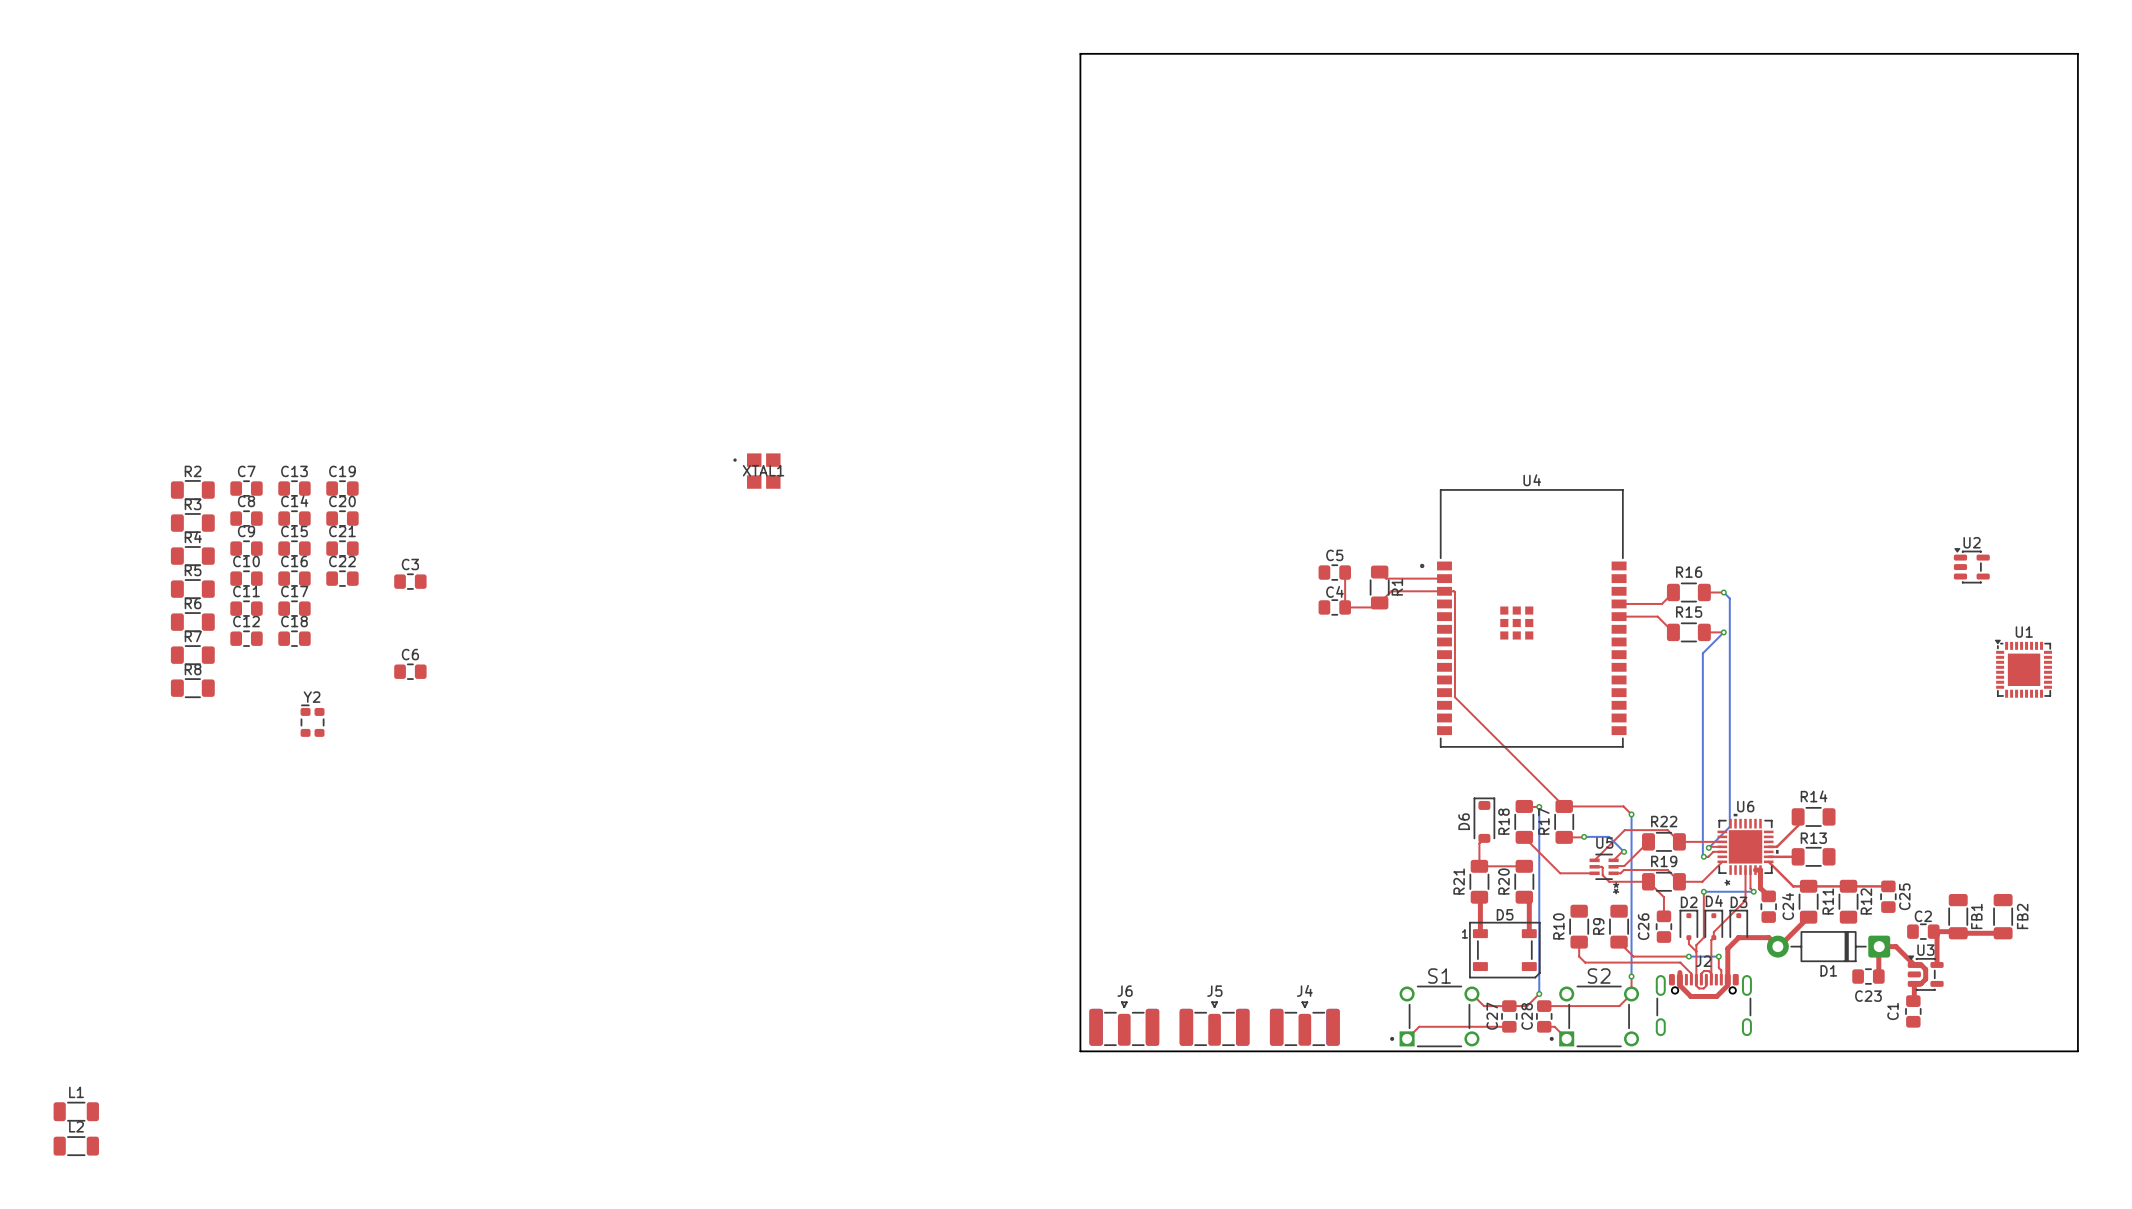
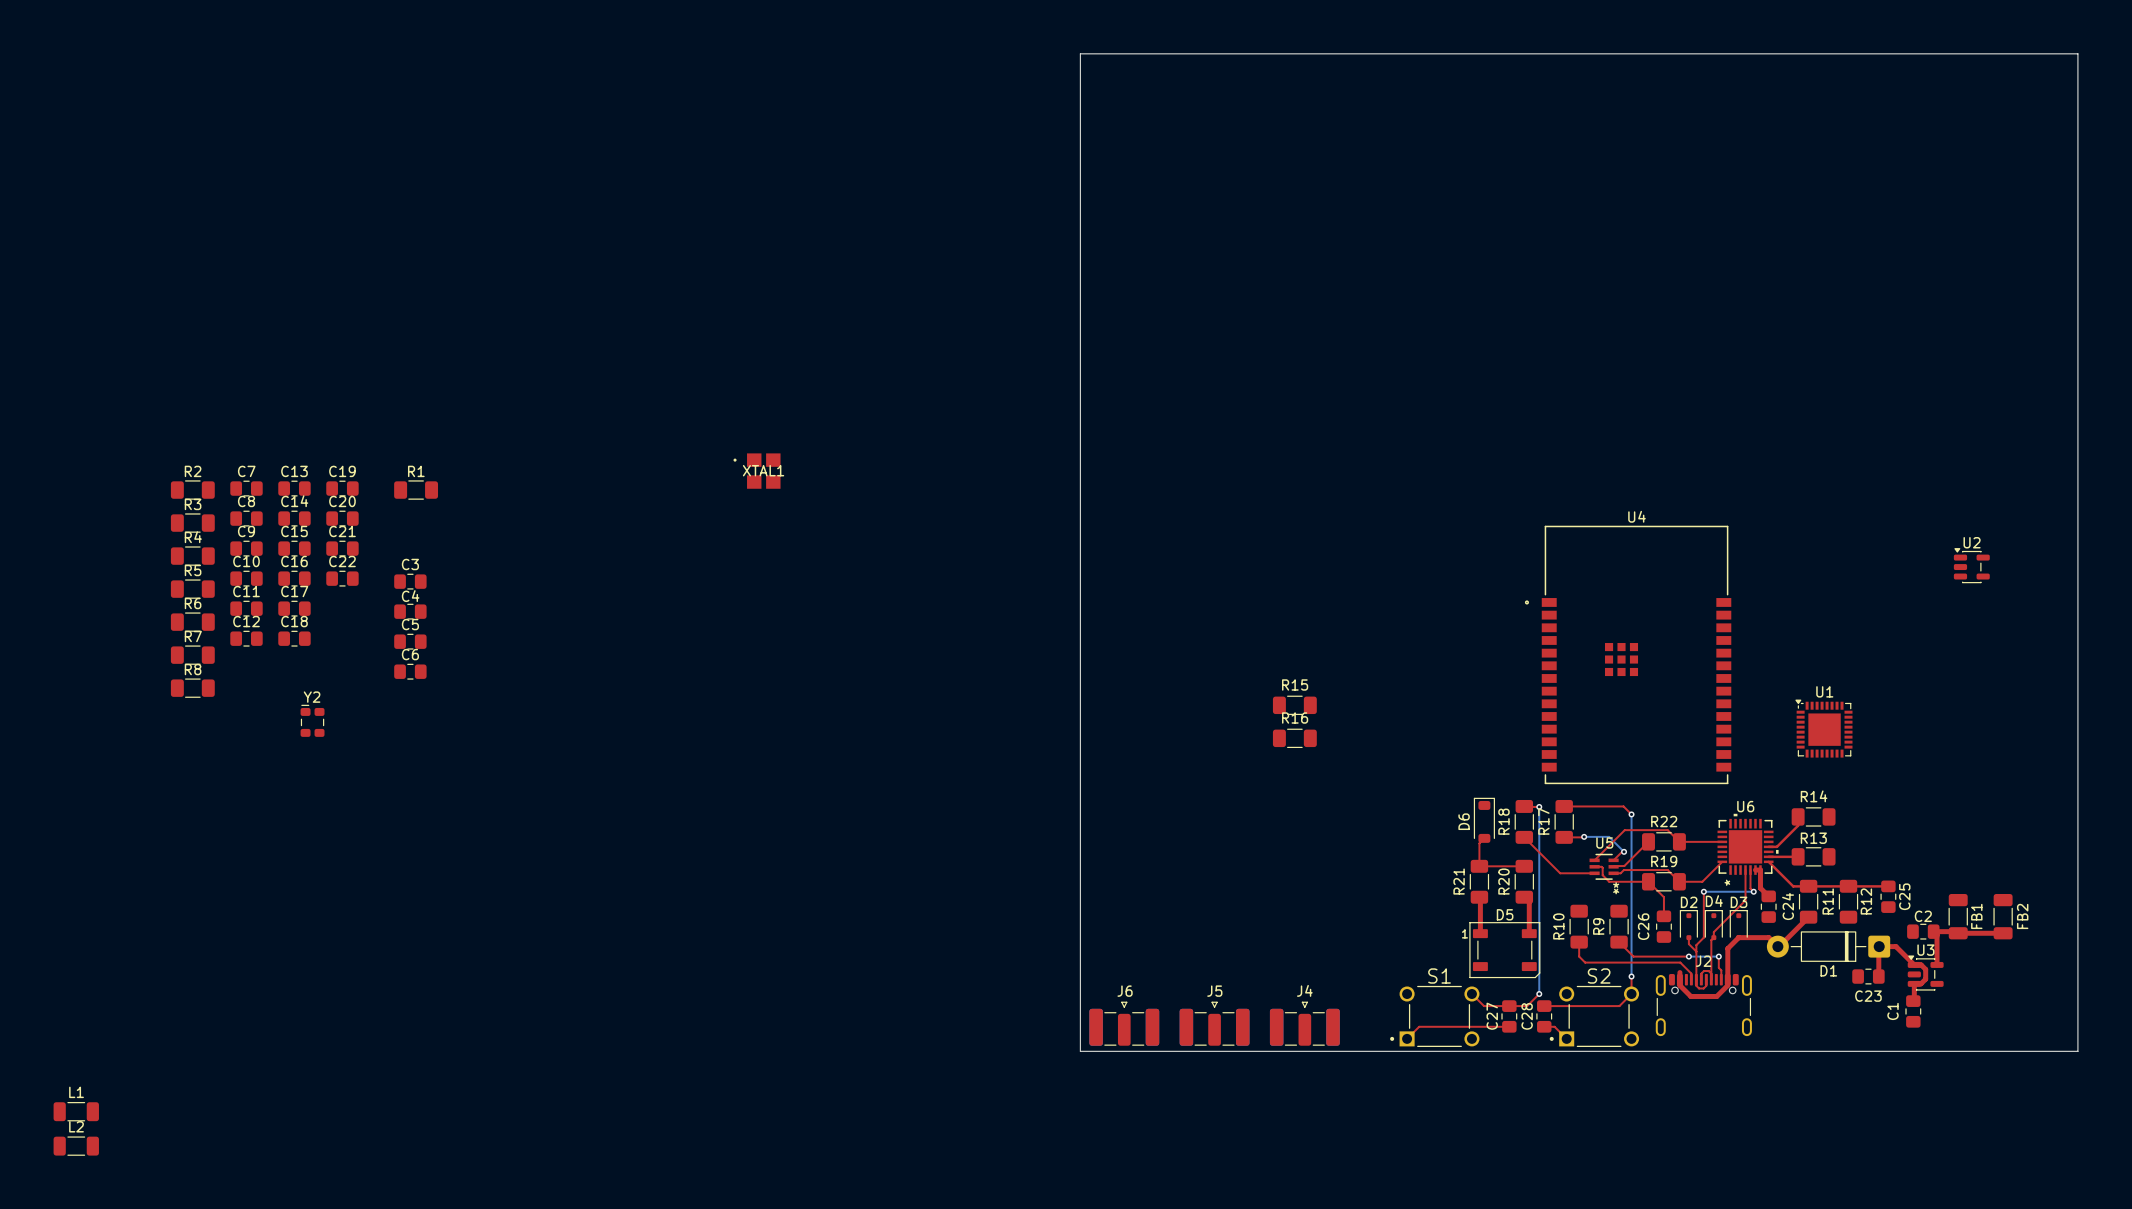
C5 position: (1334, 572) -> (410, 641)
top track: (1345, 572) (1345, 607) (1375, 607) (1391, 591) (1454, 592) (1454, 697) (1564, 806) -> none
top track: (1379, 572) (1386, 578) (1444, 578) -> none
R1 rotation: 0° (1379, 587) -> 90° clockwise (416, 490)
R1 position: (1379, 587) -> (416, 490)
R1 name position: R1 (1397, 587) -> R1 (416, 471)
top track: (1673, 592) (1661, 603) (1619, 603) -> none
R16 position: (1688, 592) -> (1294, 738)
top track: (1704, 592) (1723, 592) -> none
bottom track: (1723, 592) (1729, 598) (1729, 826) (1708, 847) -> none
via: (1723, 592) -> none
C4 position: (1334, 607) -> (410, 611)
top track: (1619, 616) (1657, 616) (1673, 632) -> none
U4 position: (1523, 618) -> (1628, 654)
R15 position: (1688, 632) -> (1294, 705)
top track: (1704, 632) (1723, 632) -> none
bottom track: (1723, 632) (1702, 653) (1703, 856) -> none
via: (1723, 632) -> none
U1 position: (2023, 668) -> (1823, 728)
top track: (1722, 846) (1708, 847) -> none
via: (1708, 847) -> none
top track: (1722, 851) (1713, 851) (1708, 856) (1703, 856) -> none
via: (1703, 856) -> none

